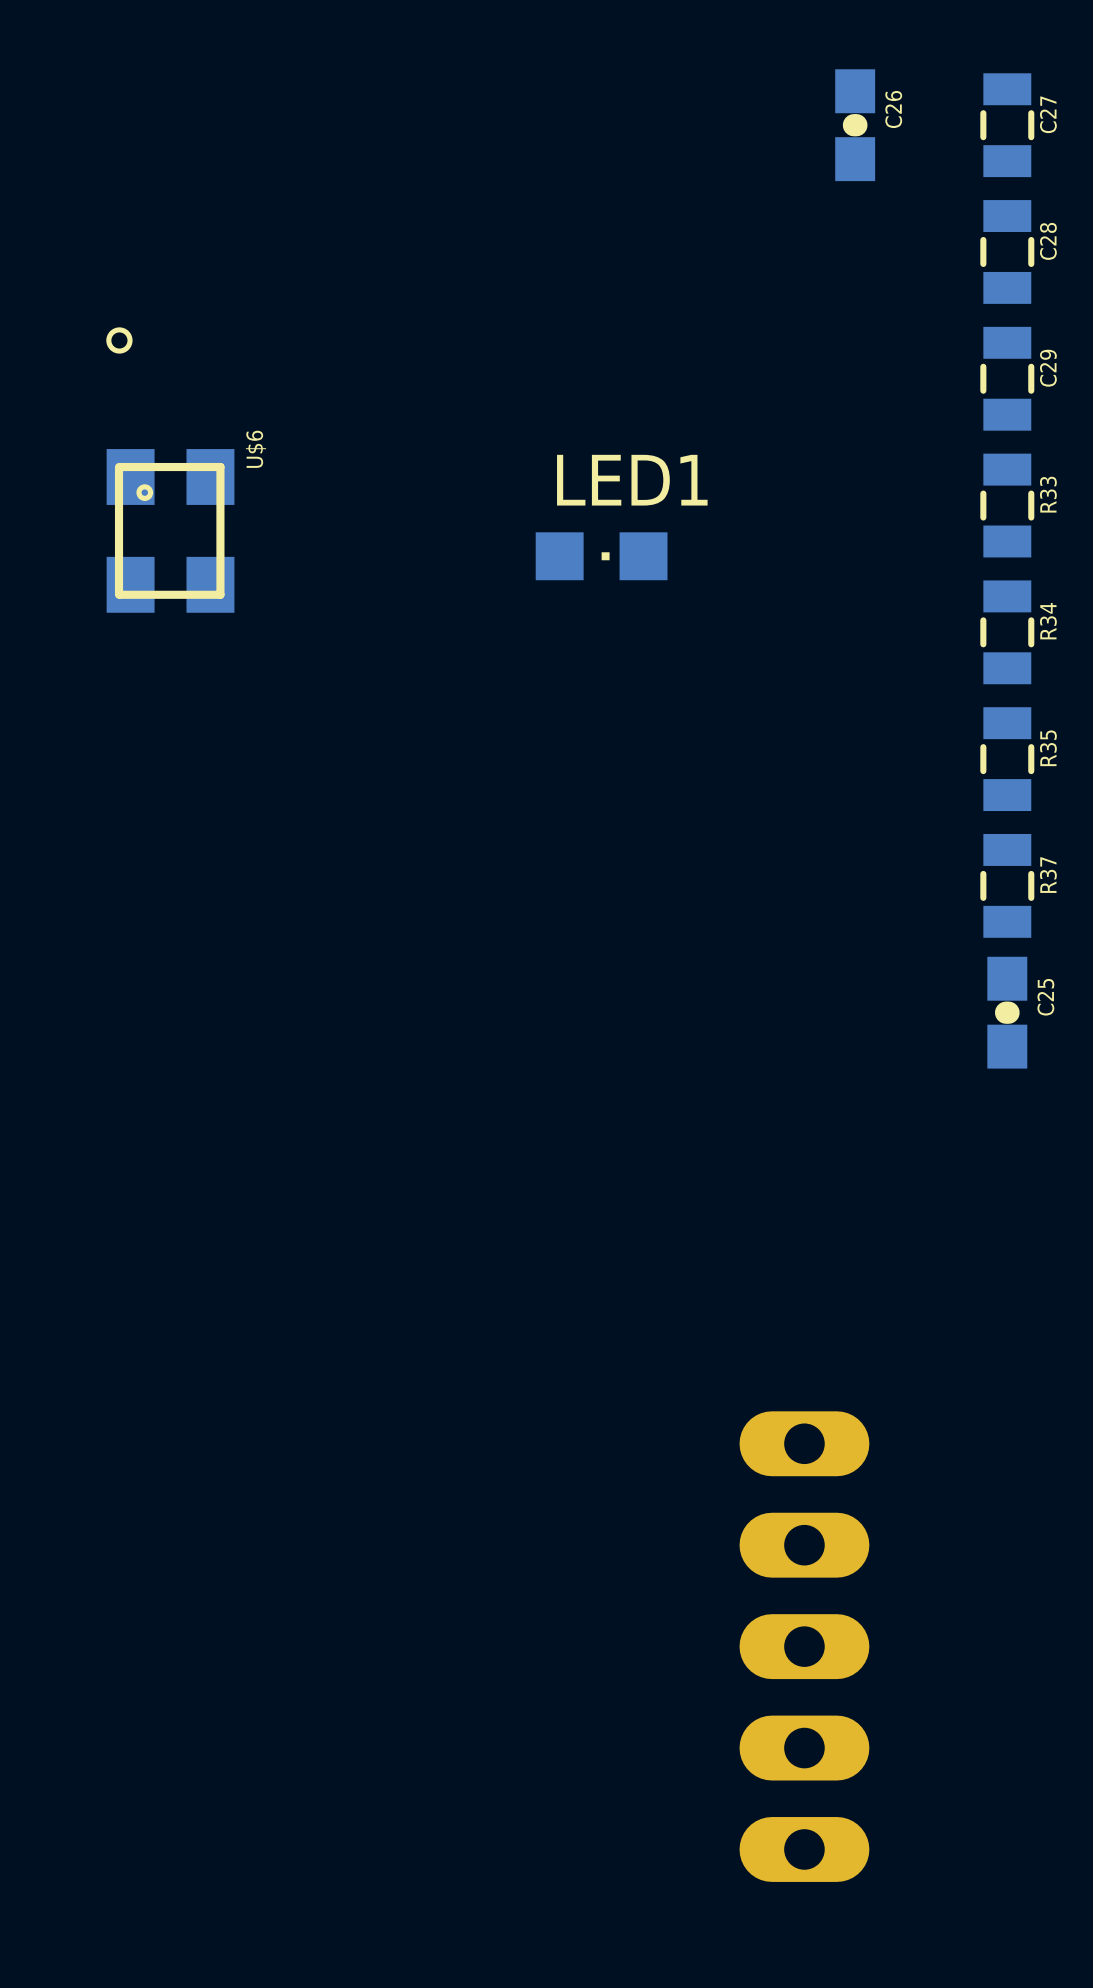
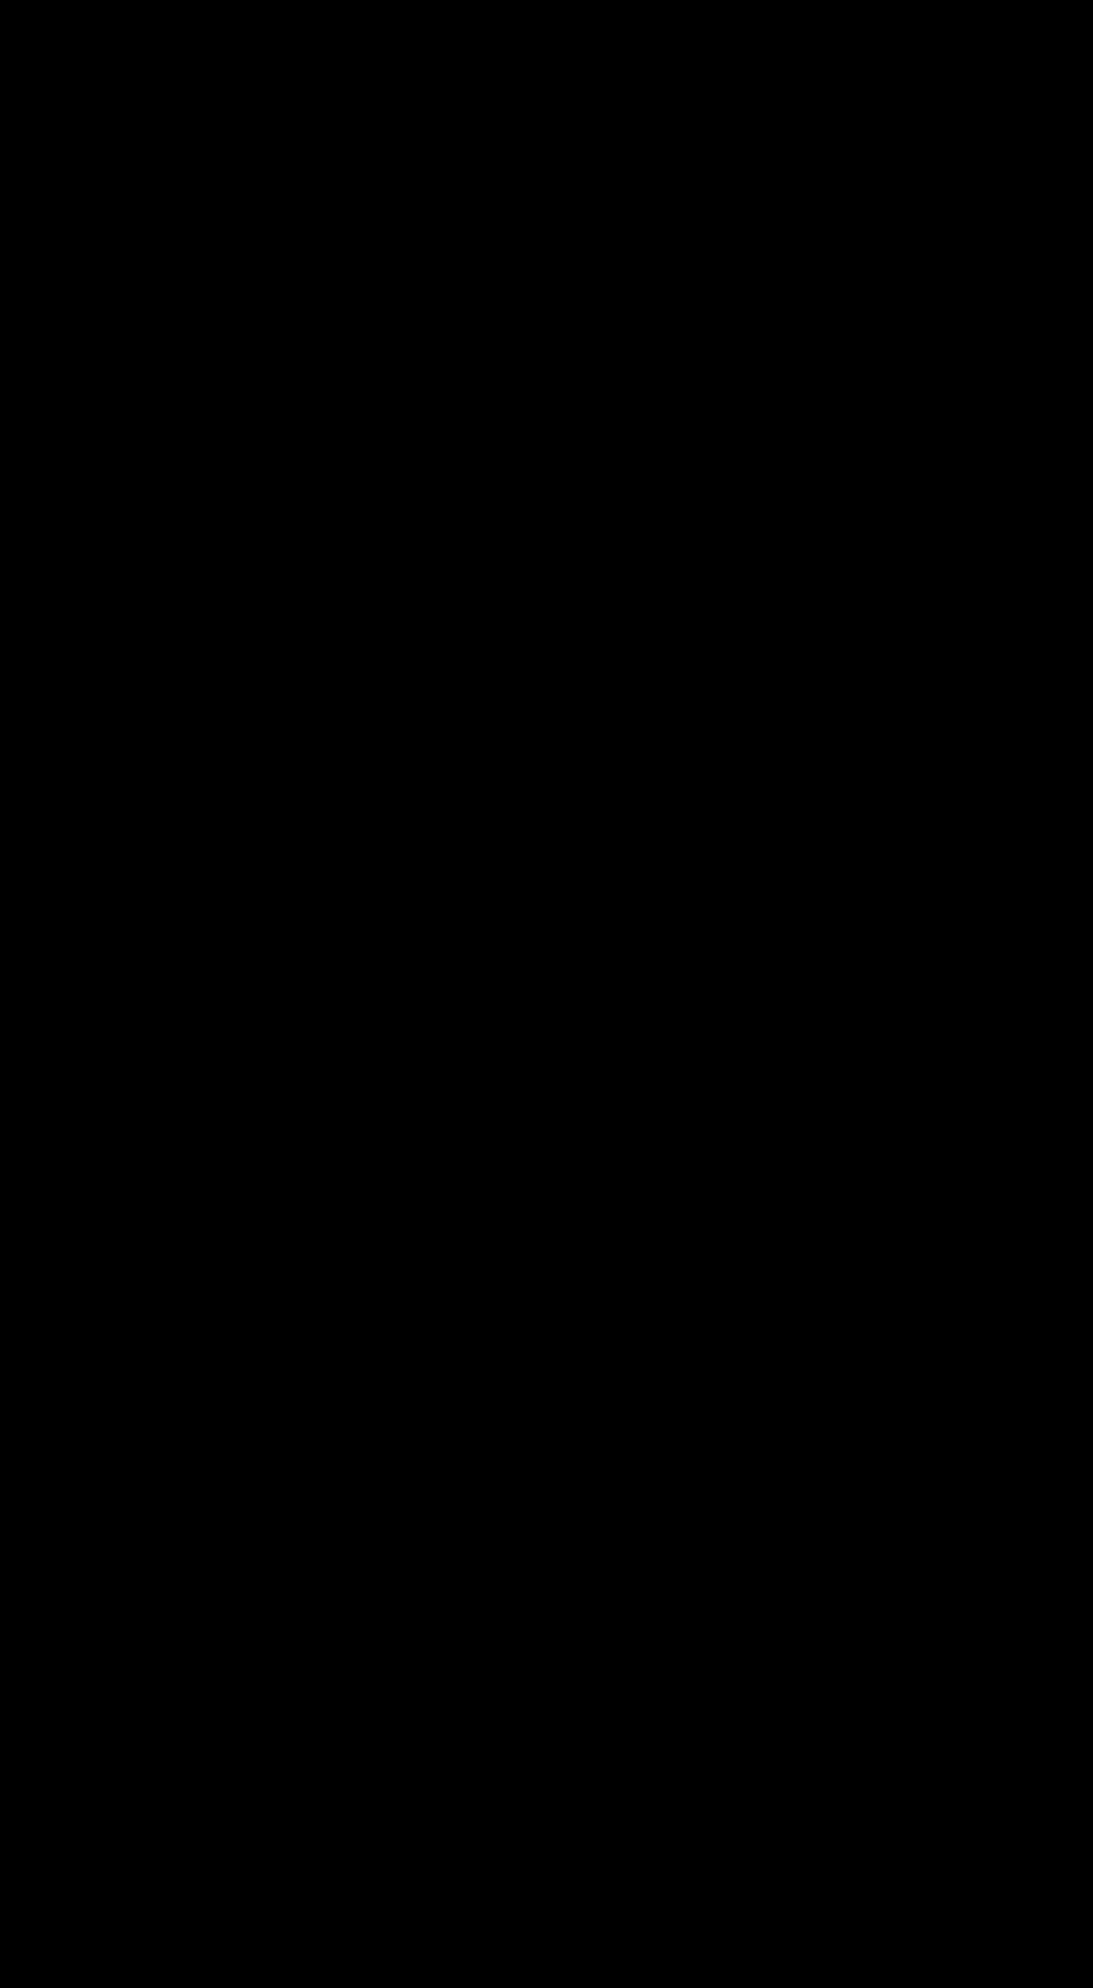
C26: (855, 125) -> none
C27: (1007, 125) -> none
C28: (1007, 251) -> none
C29: (1007, 378) -> none
U$6: (170, 470) -> none
R33: (1007, 505) -> none
LED1: (601, 556) -> none
R34: (1007, 632) -> none
R35: (1007, 759) -> none
R37: (1007, 885) -> none
C25: (1007, 1012) -> none
part: (804, 1646) -> none

